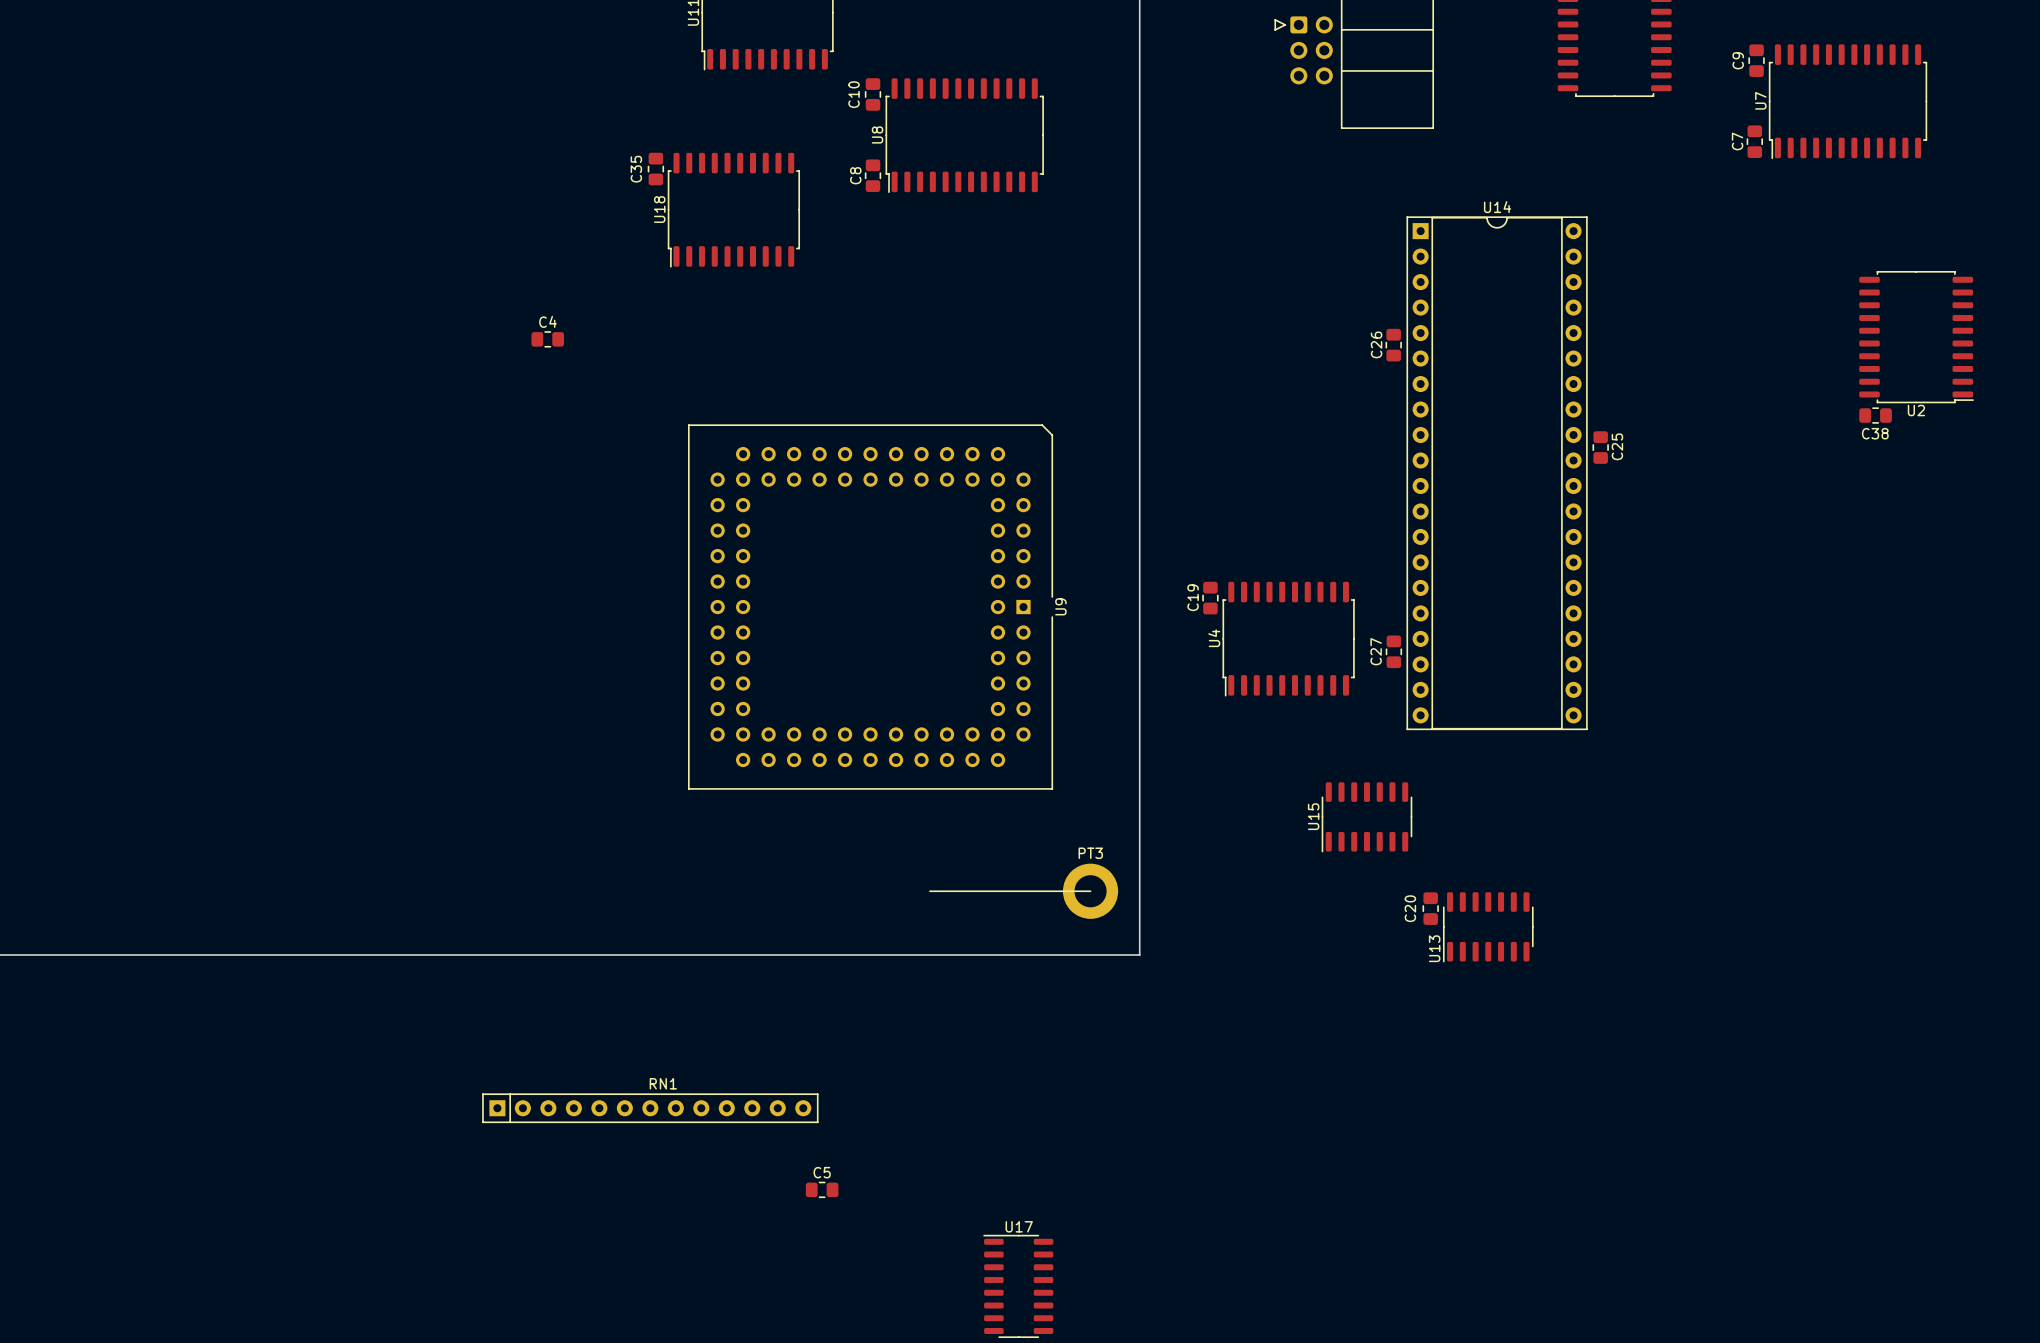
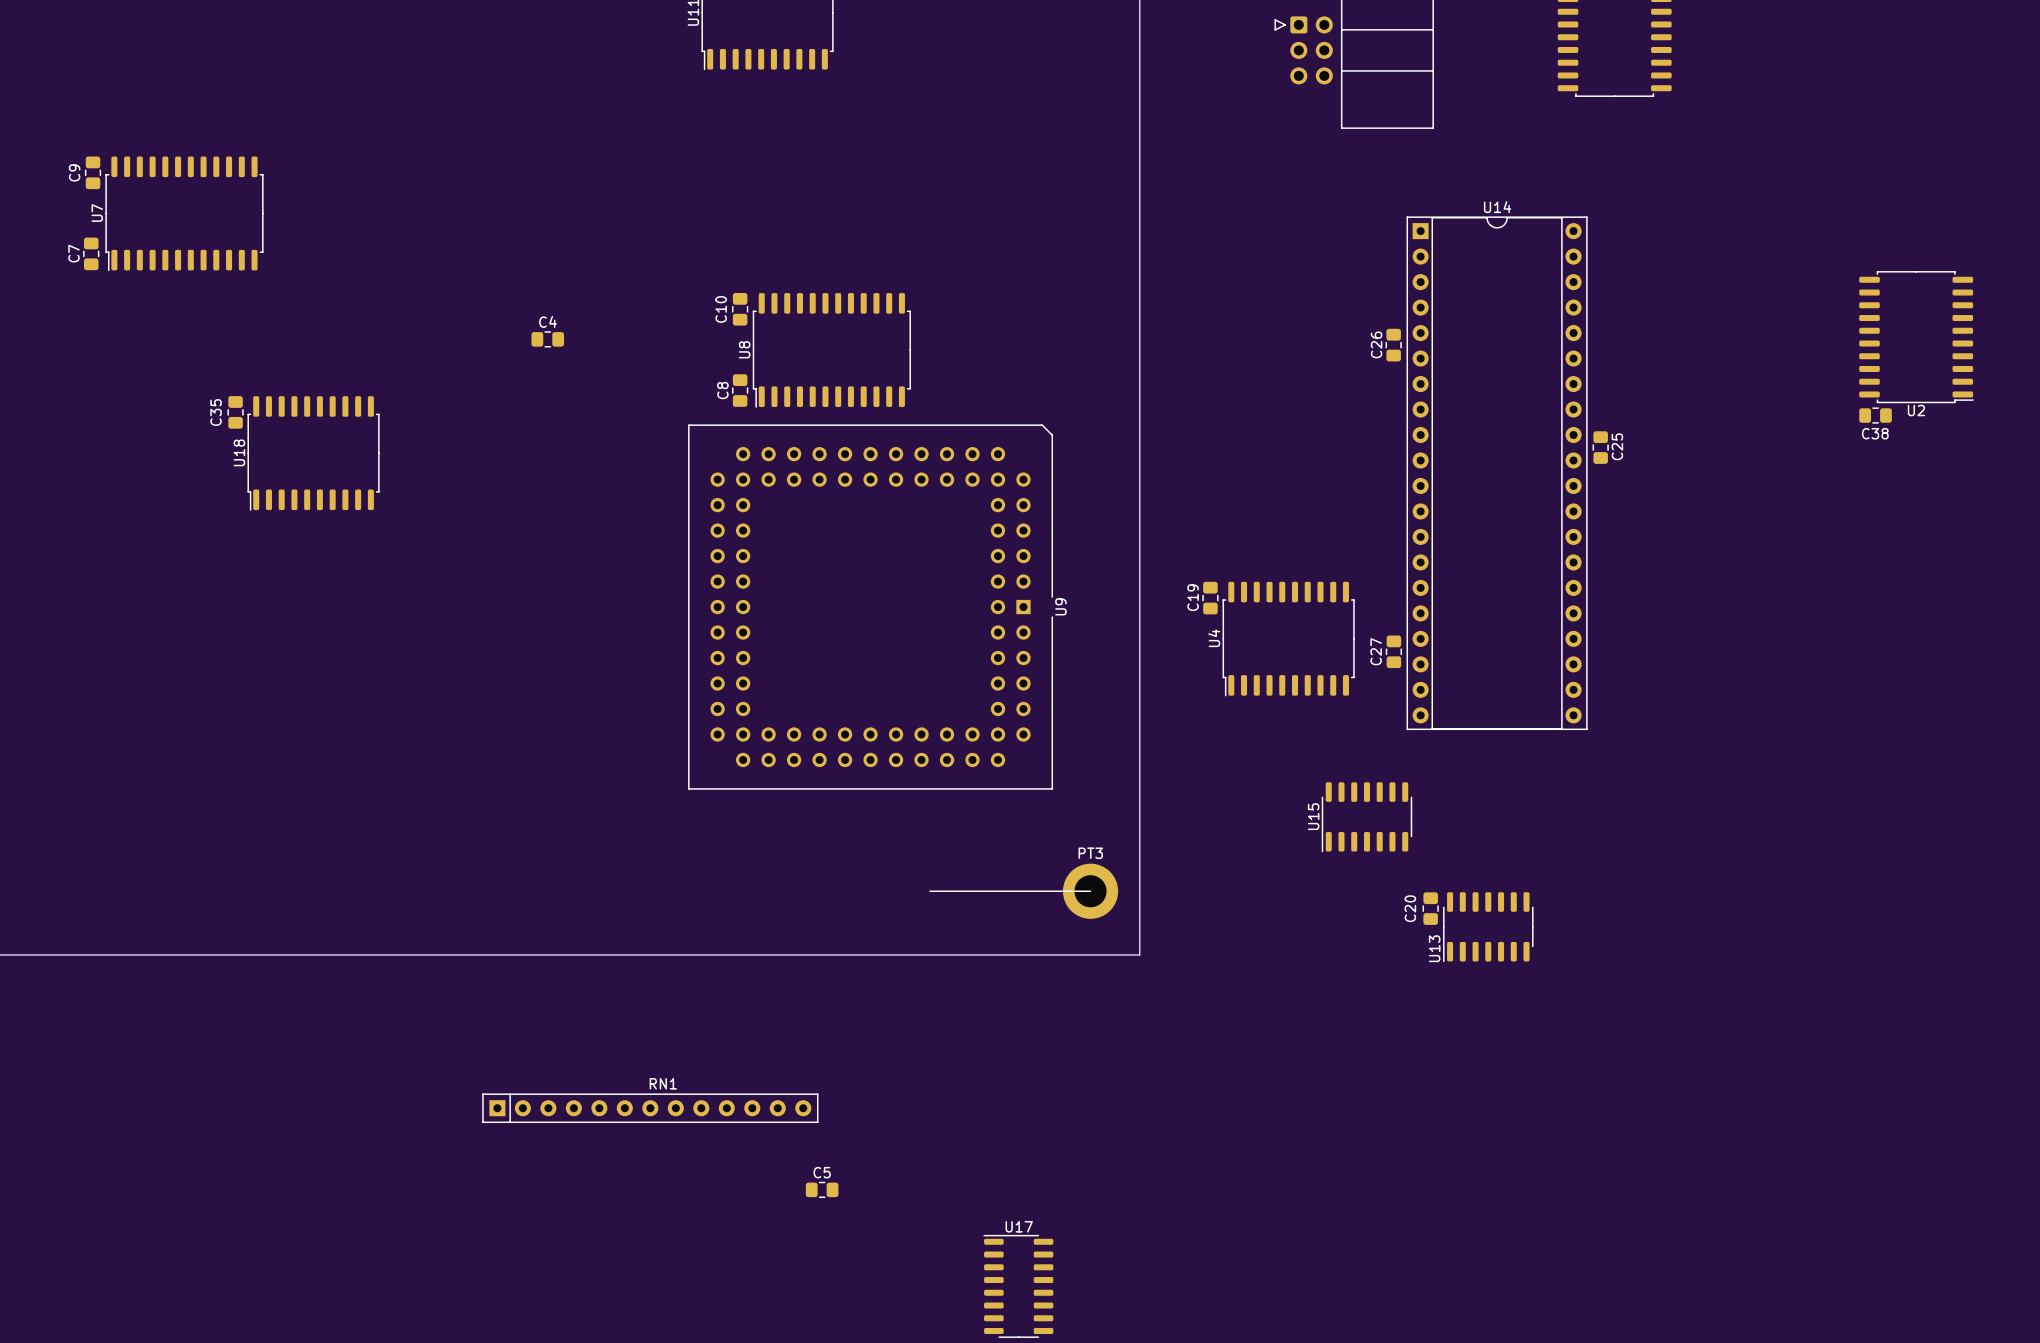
C9 position: (1756, 60) -> (93, 172)
C10 position: (873, 94) -> (740, 309)
U7 position: (1848, 101) -> (184, 213)
U8 position: (964, 135) -> (831, 350)
C7 position: (1754, 141) -> (91, 253)
C35 position: (655, 169) -> (235, 412)
C8 position: (873, 175) -> (740, 390)
U18 position: (733, 210) -> (313, 453)

